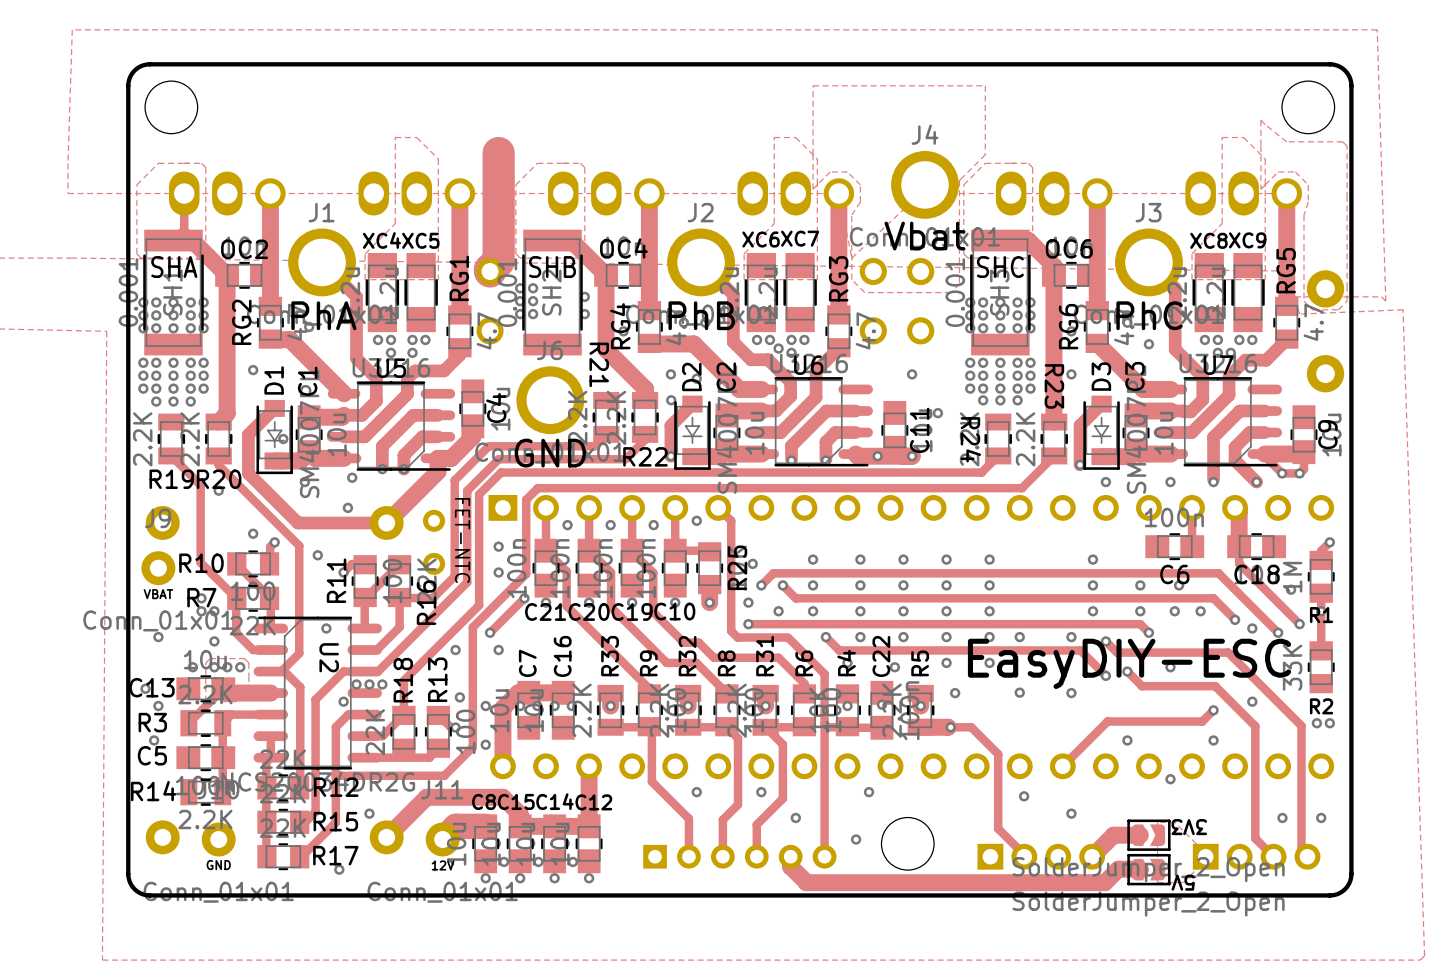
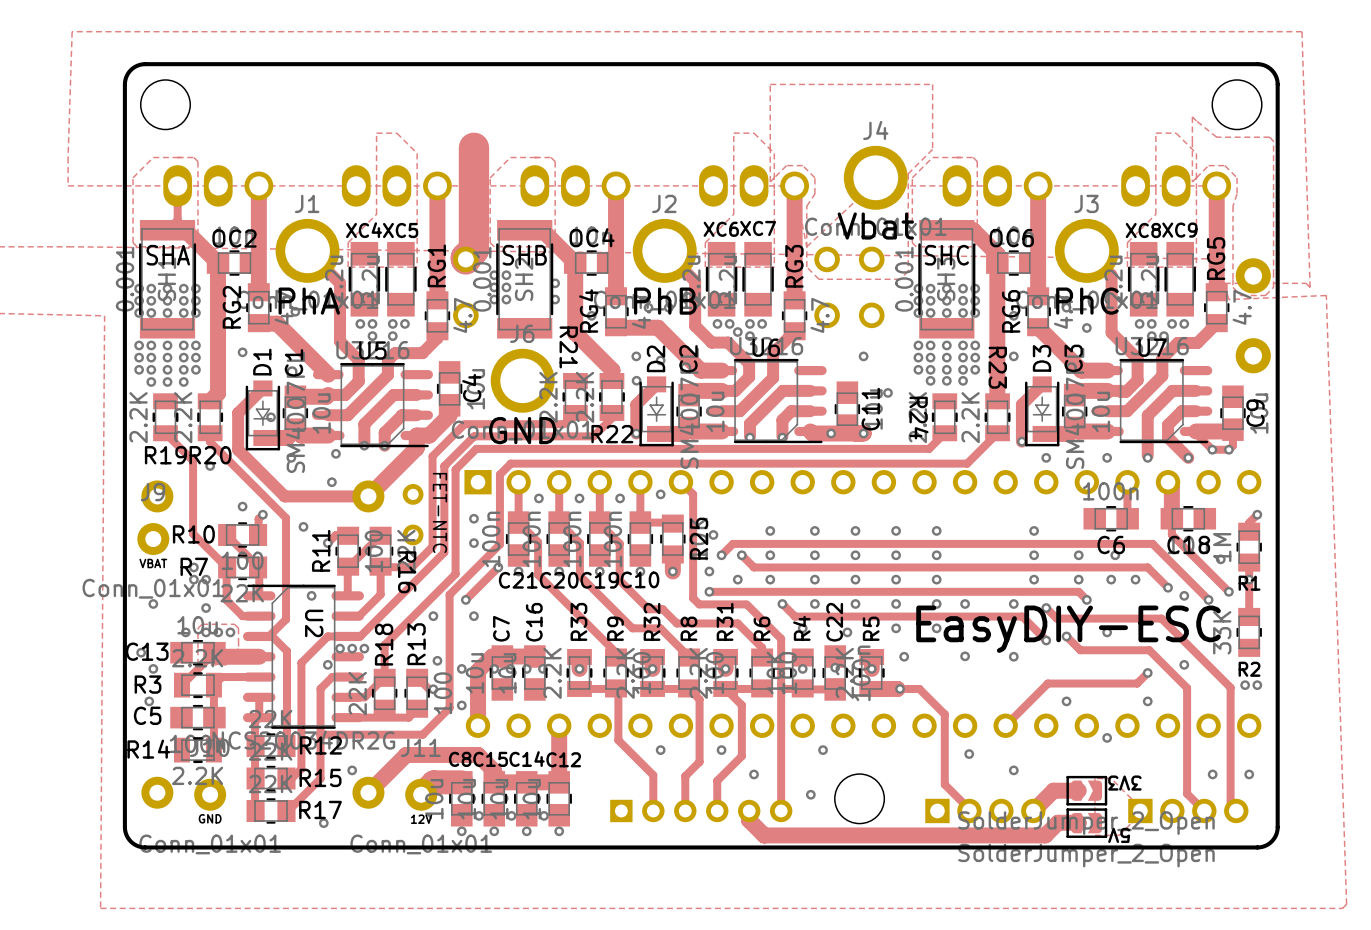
R16 name rotation: 0° (426, 602) -> 180° (407, 572)

